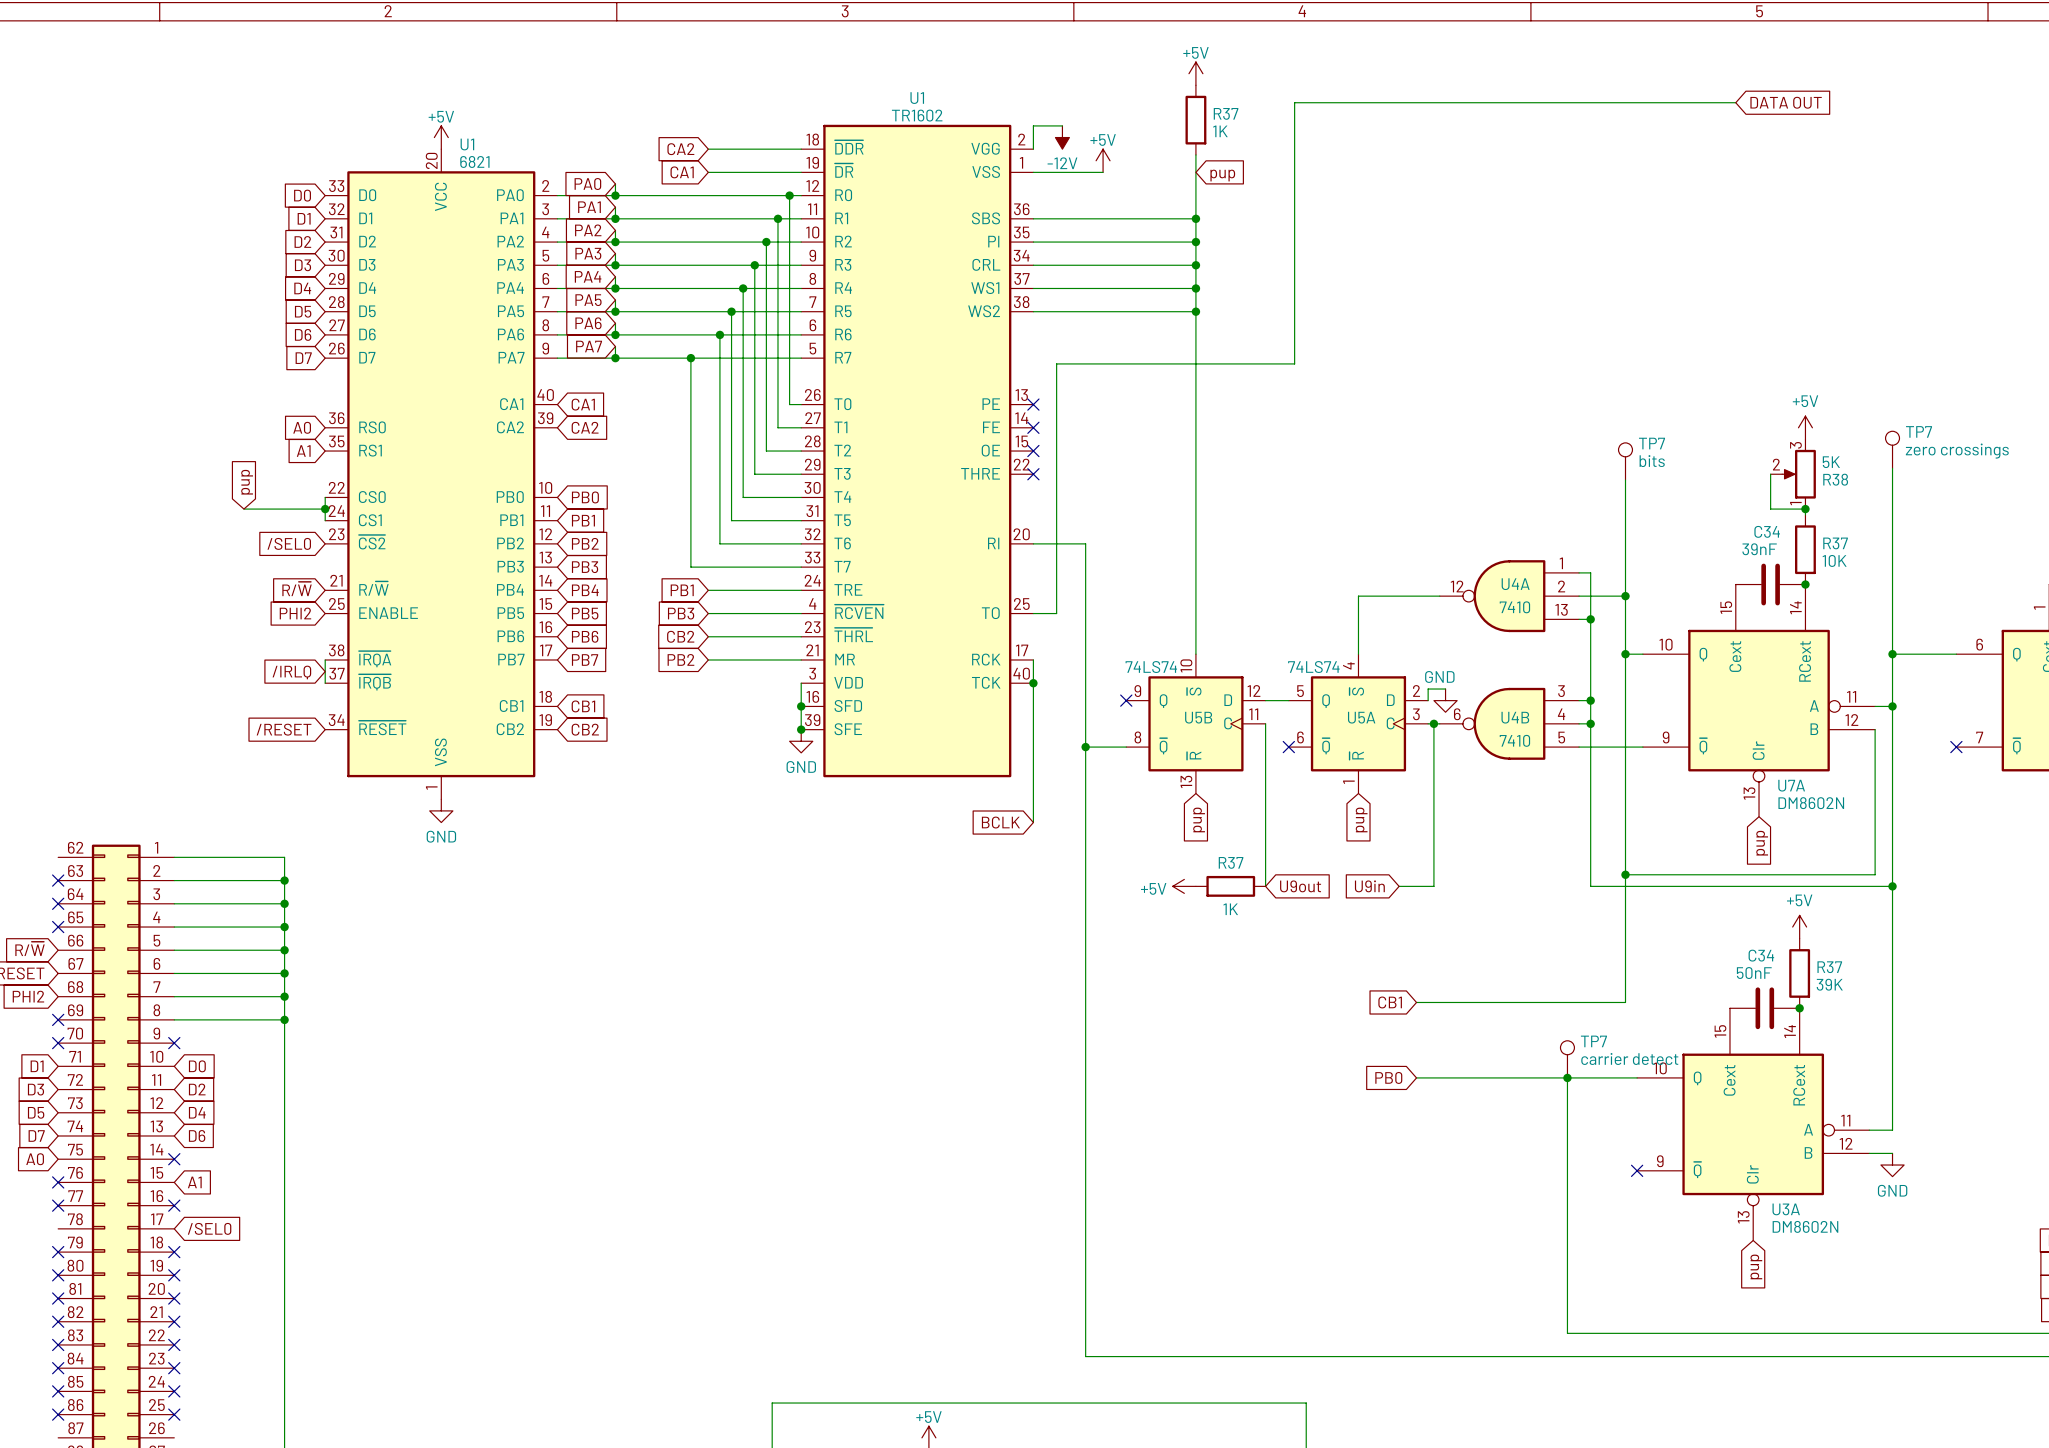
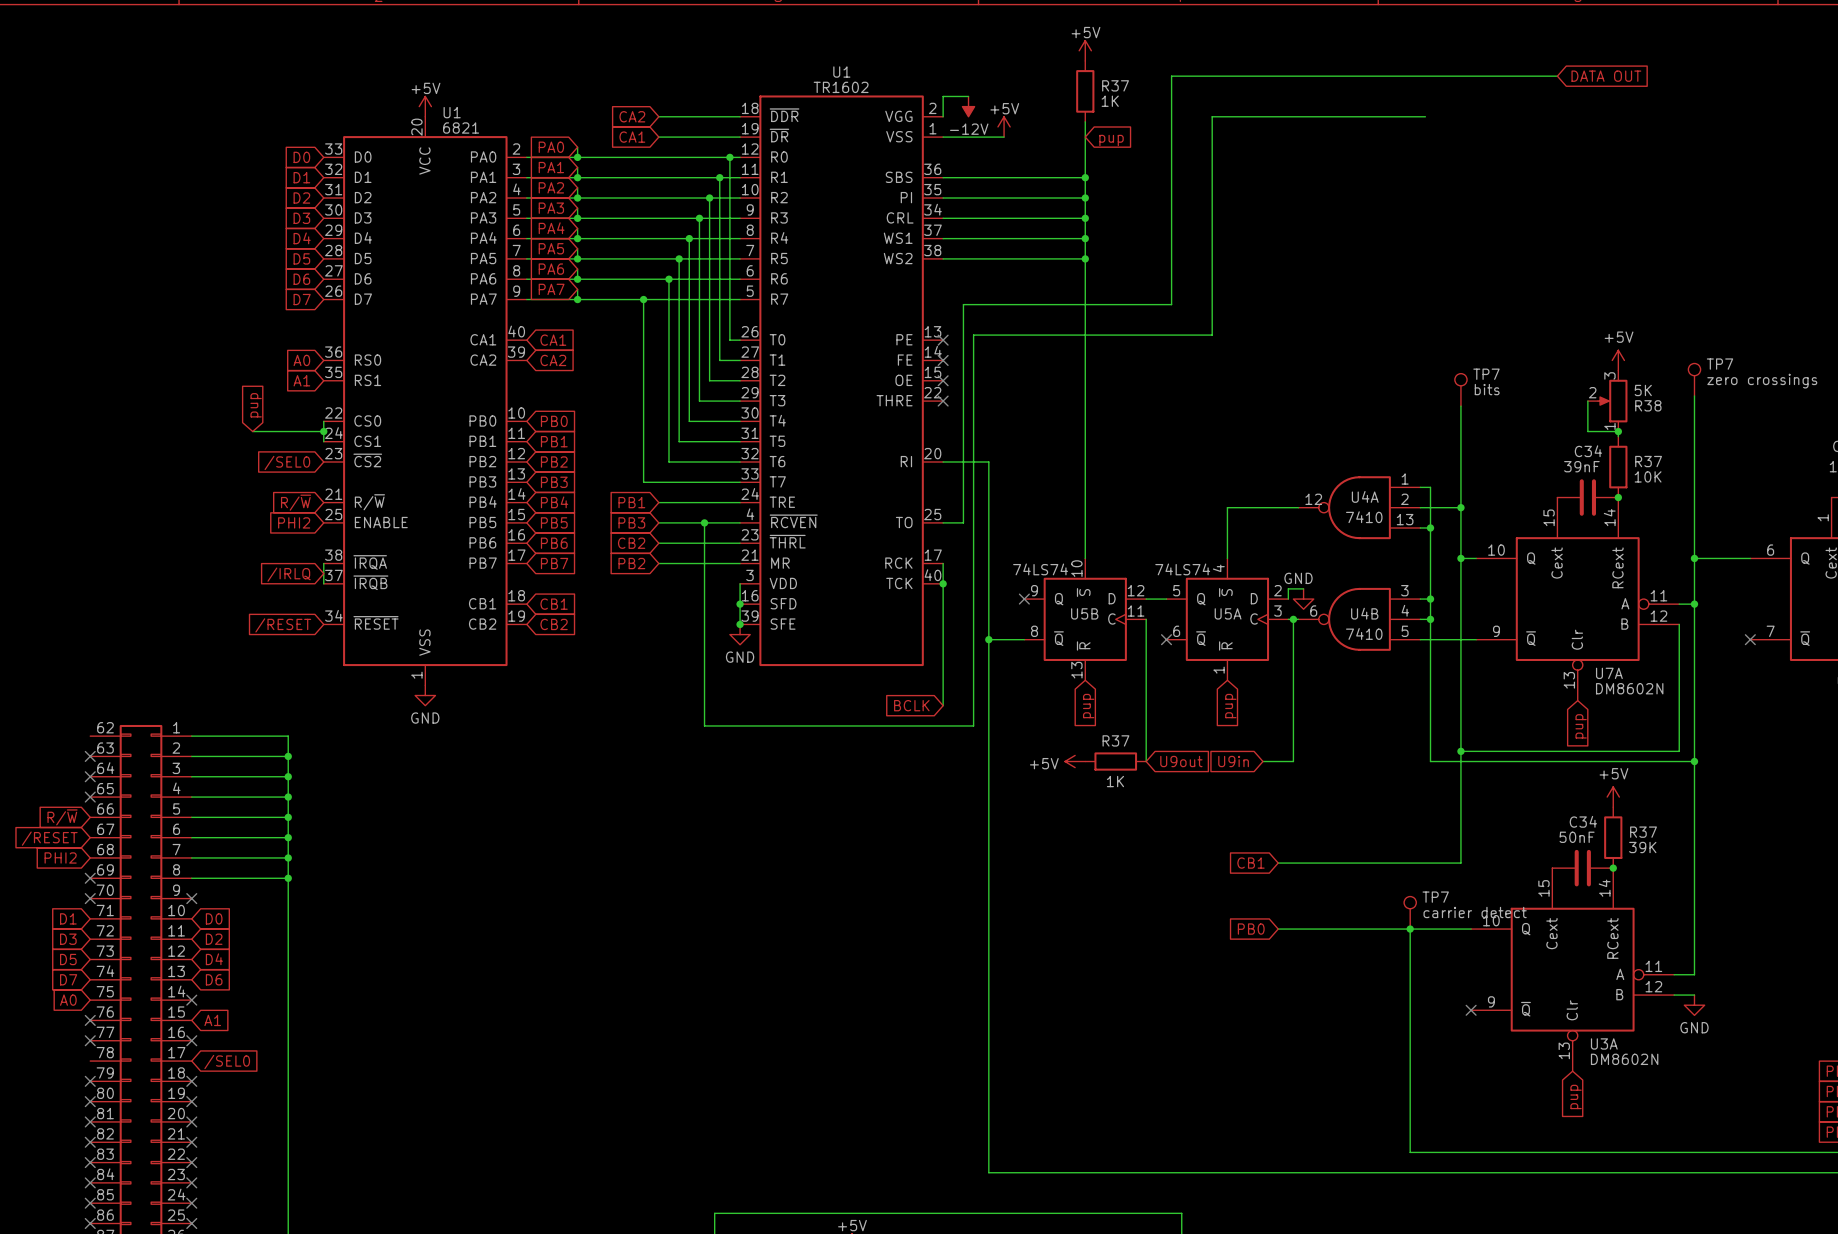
wire: none -> (1425, 116) (1212, 116) (1212, 335) (973, 335) (973, 725) (704, 725) (704, 522)
junction: none -> (704, 522)

